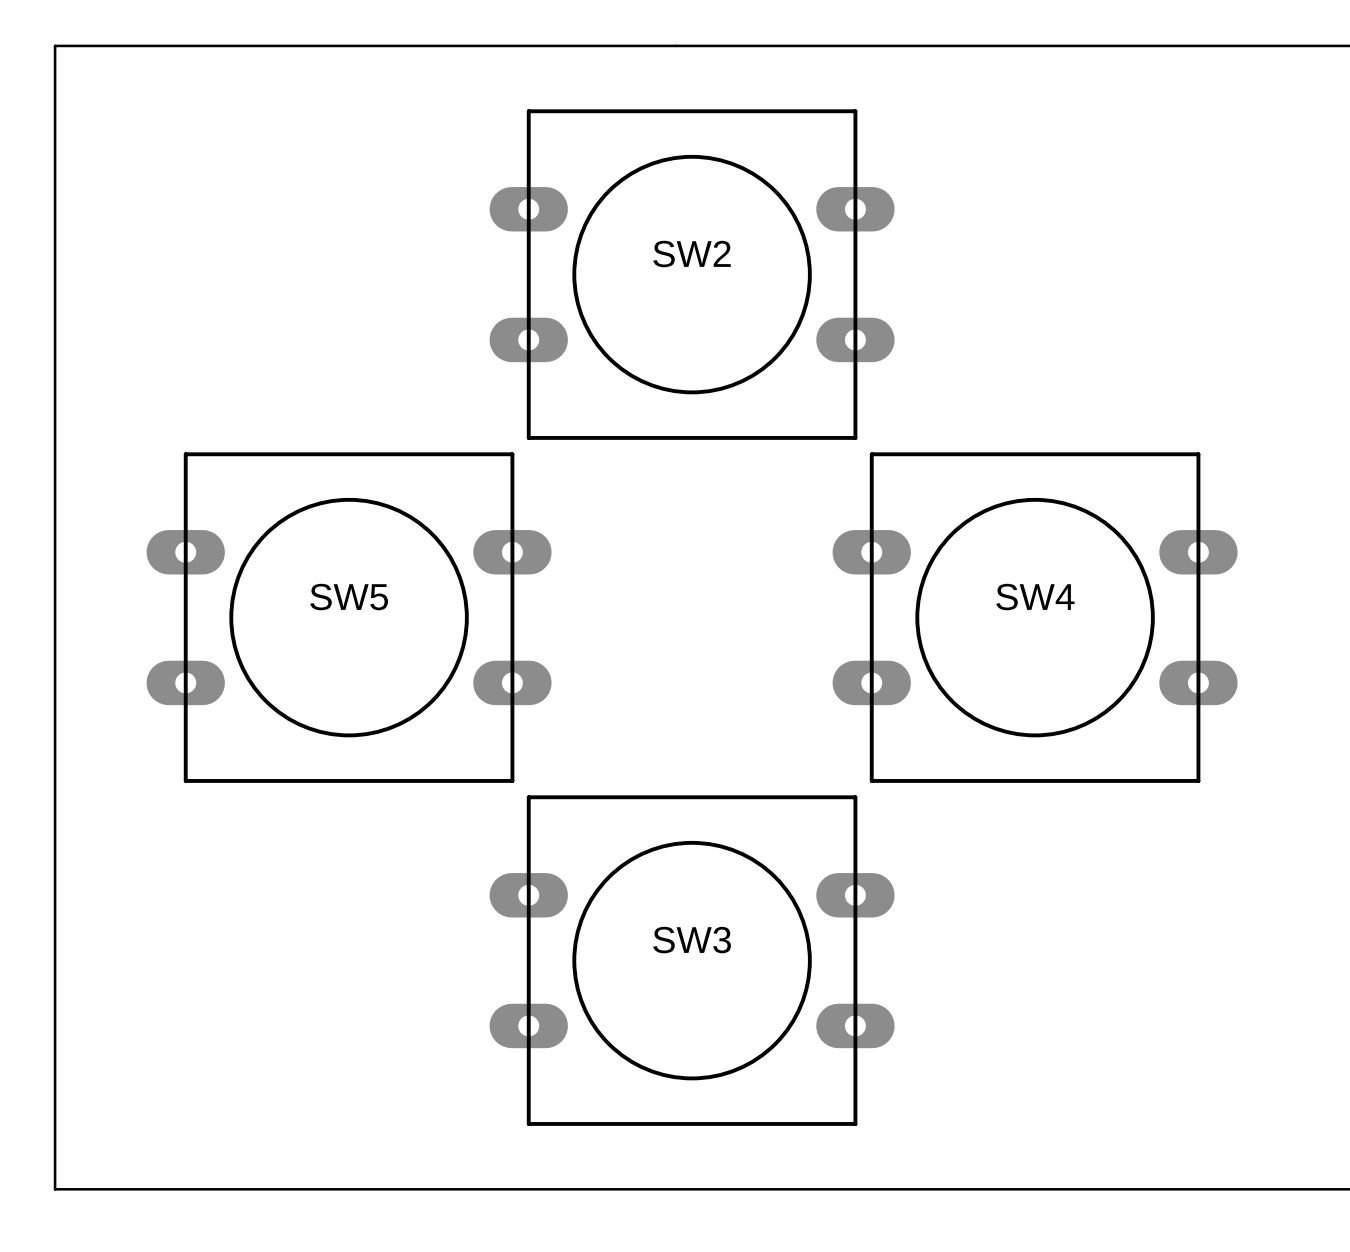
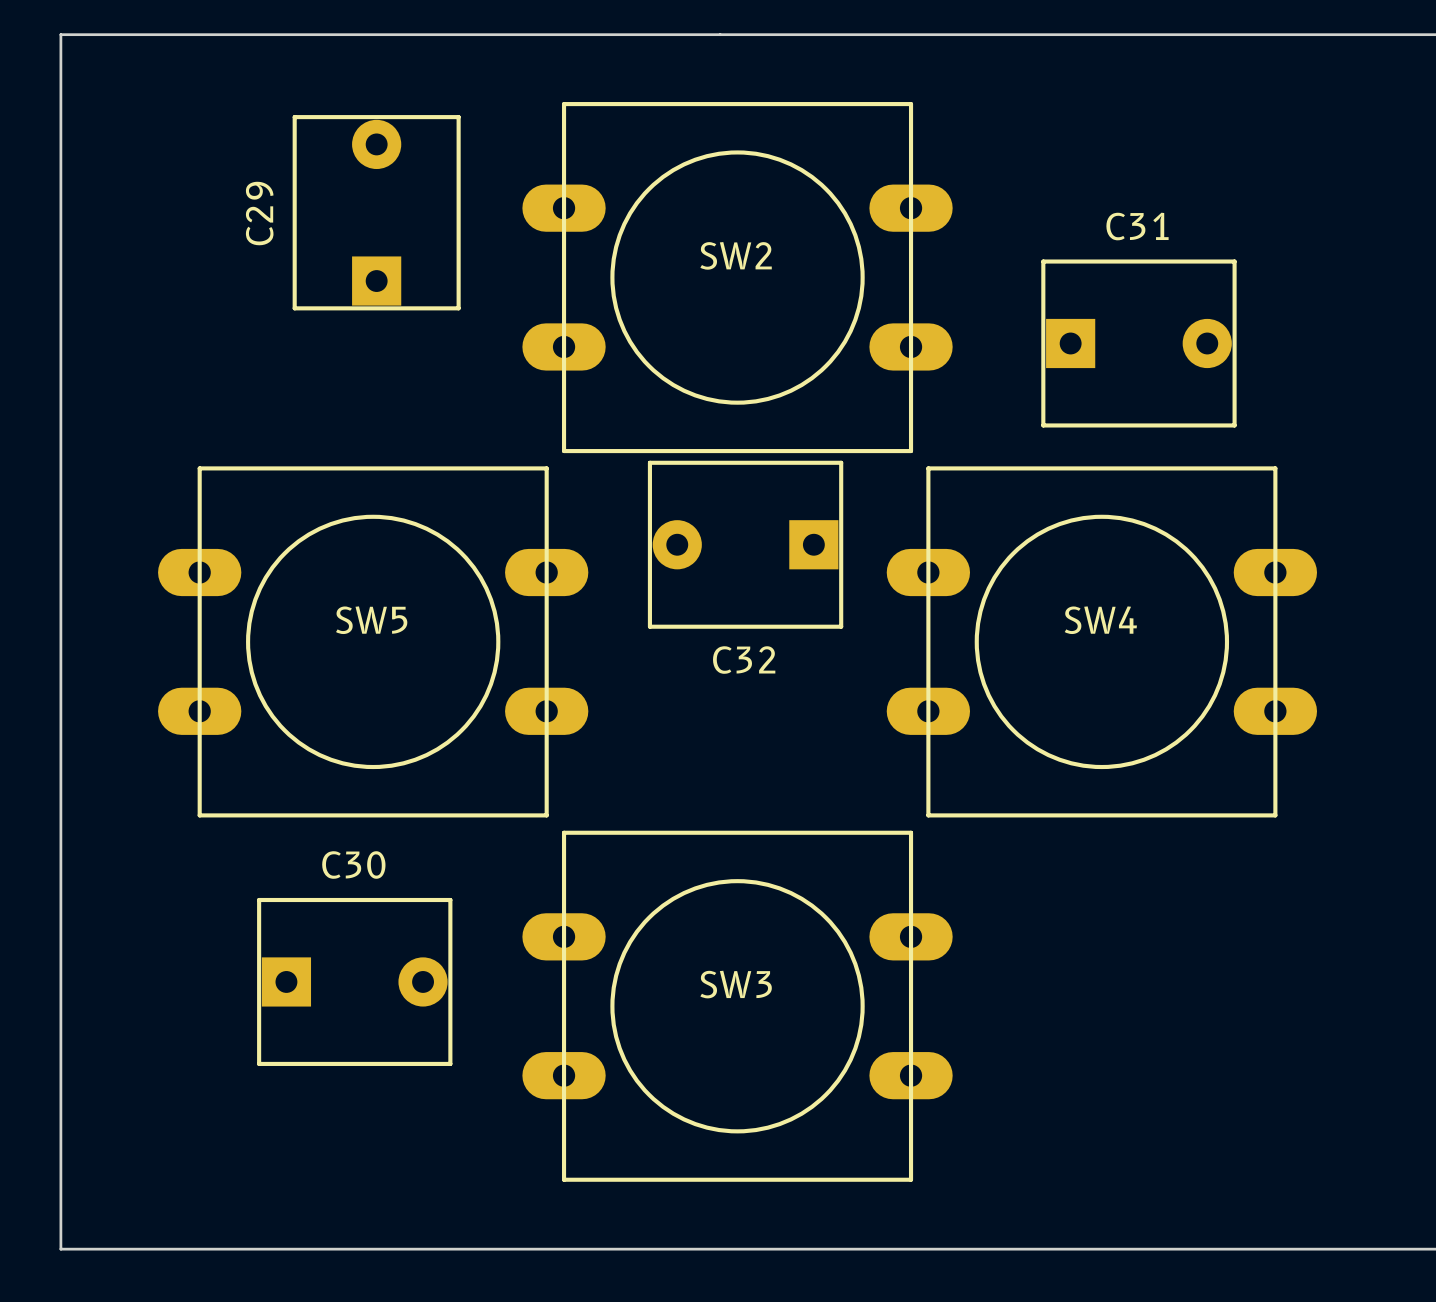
C29: none -> (376, 212)
C31: none -> (1138, 343)
C32: none -> (745, 544)
C30: none -> (354, 981)

